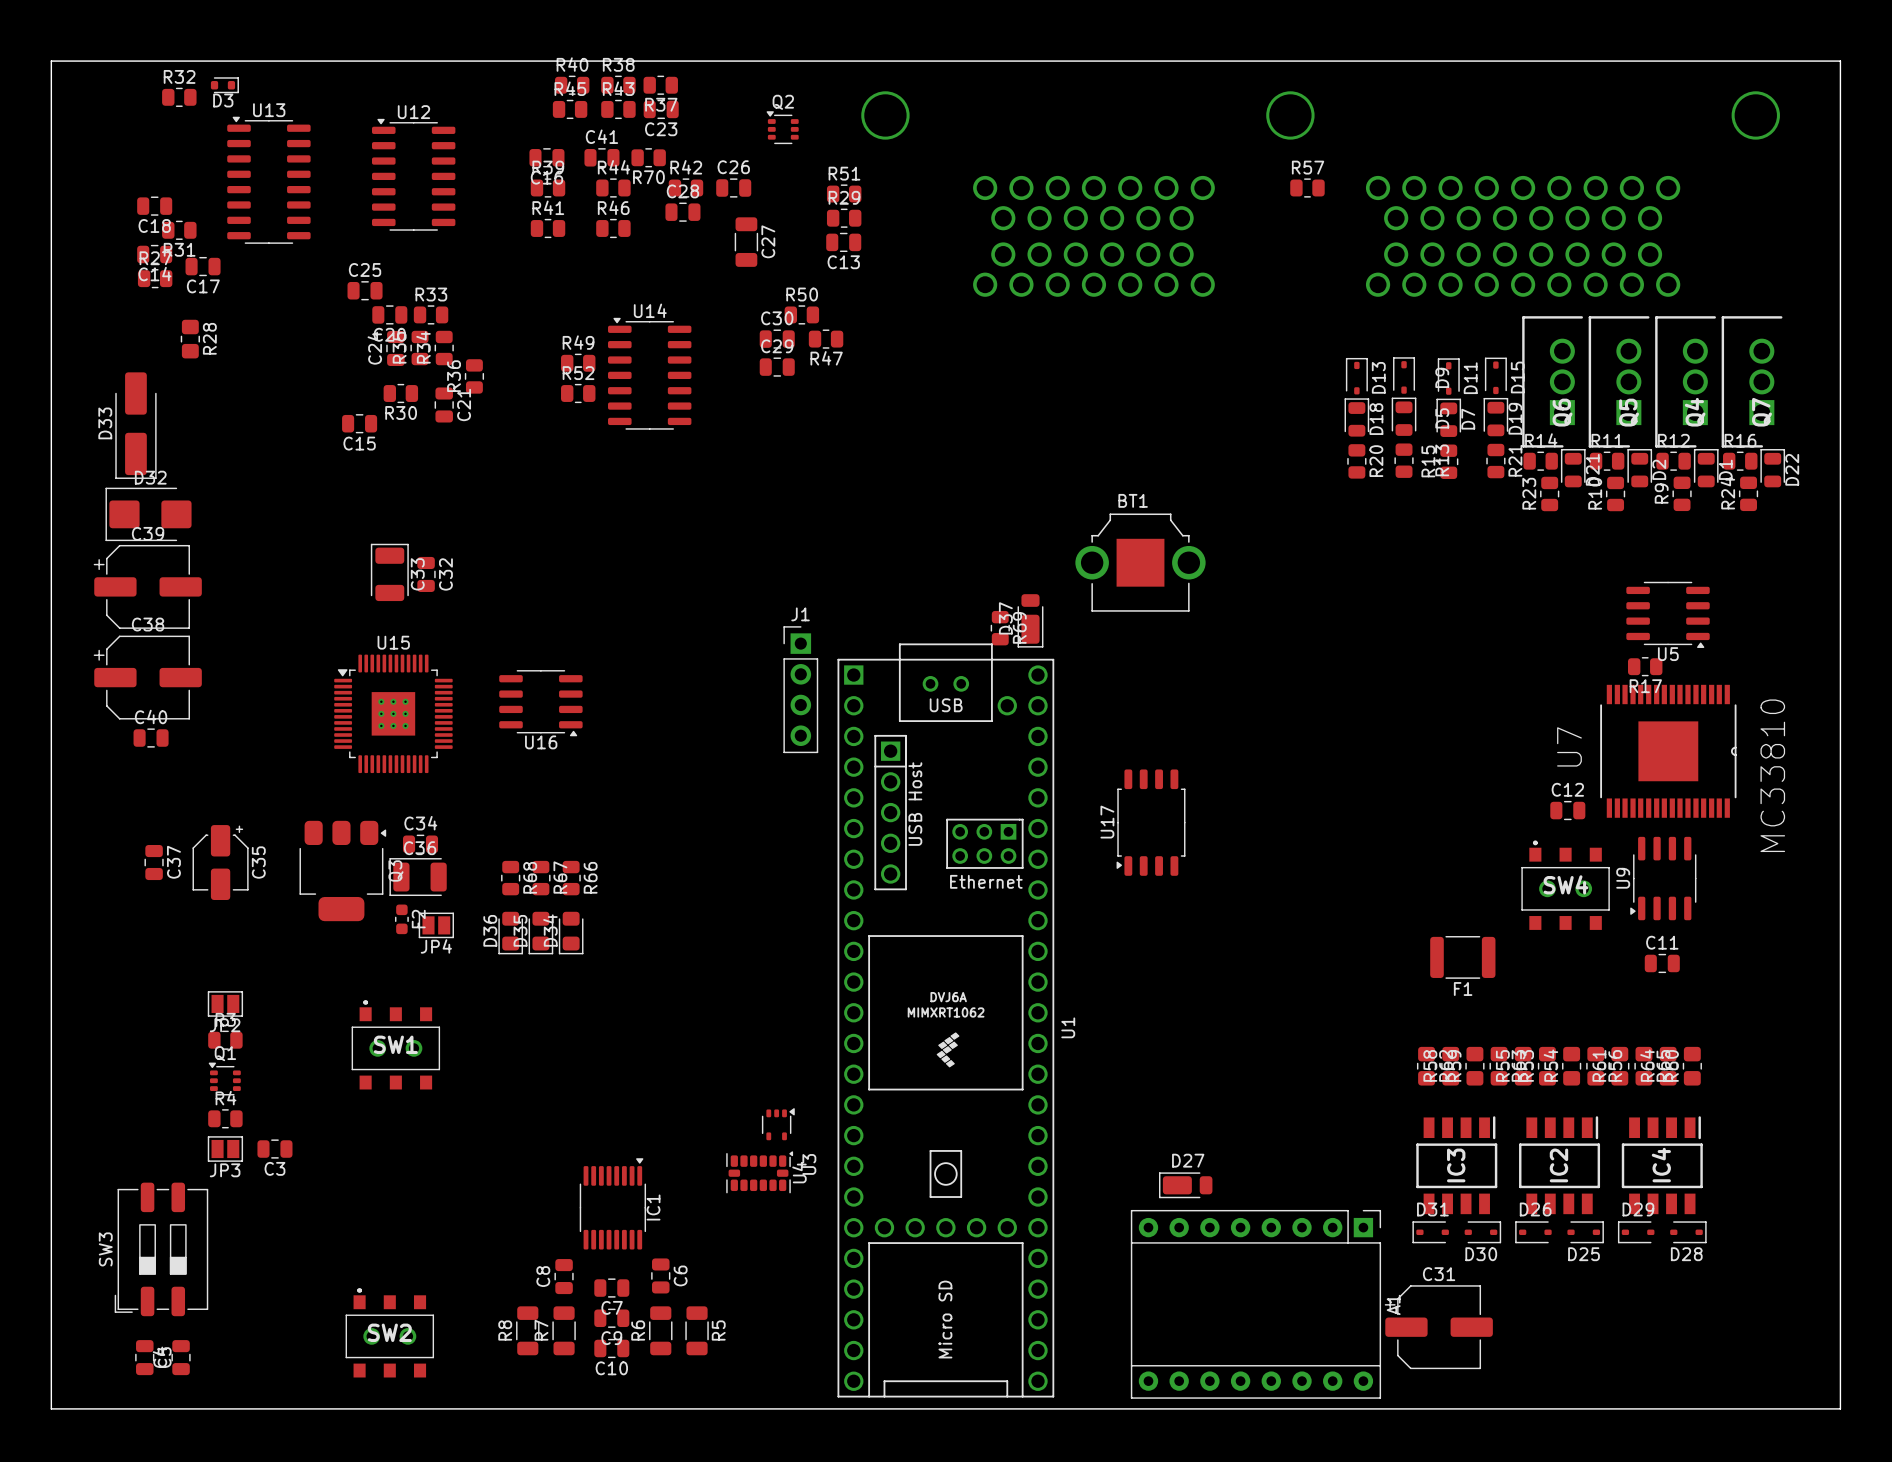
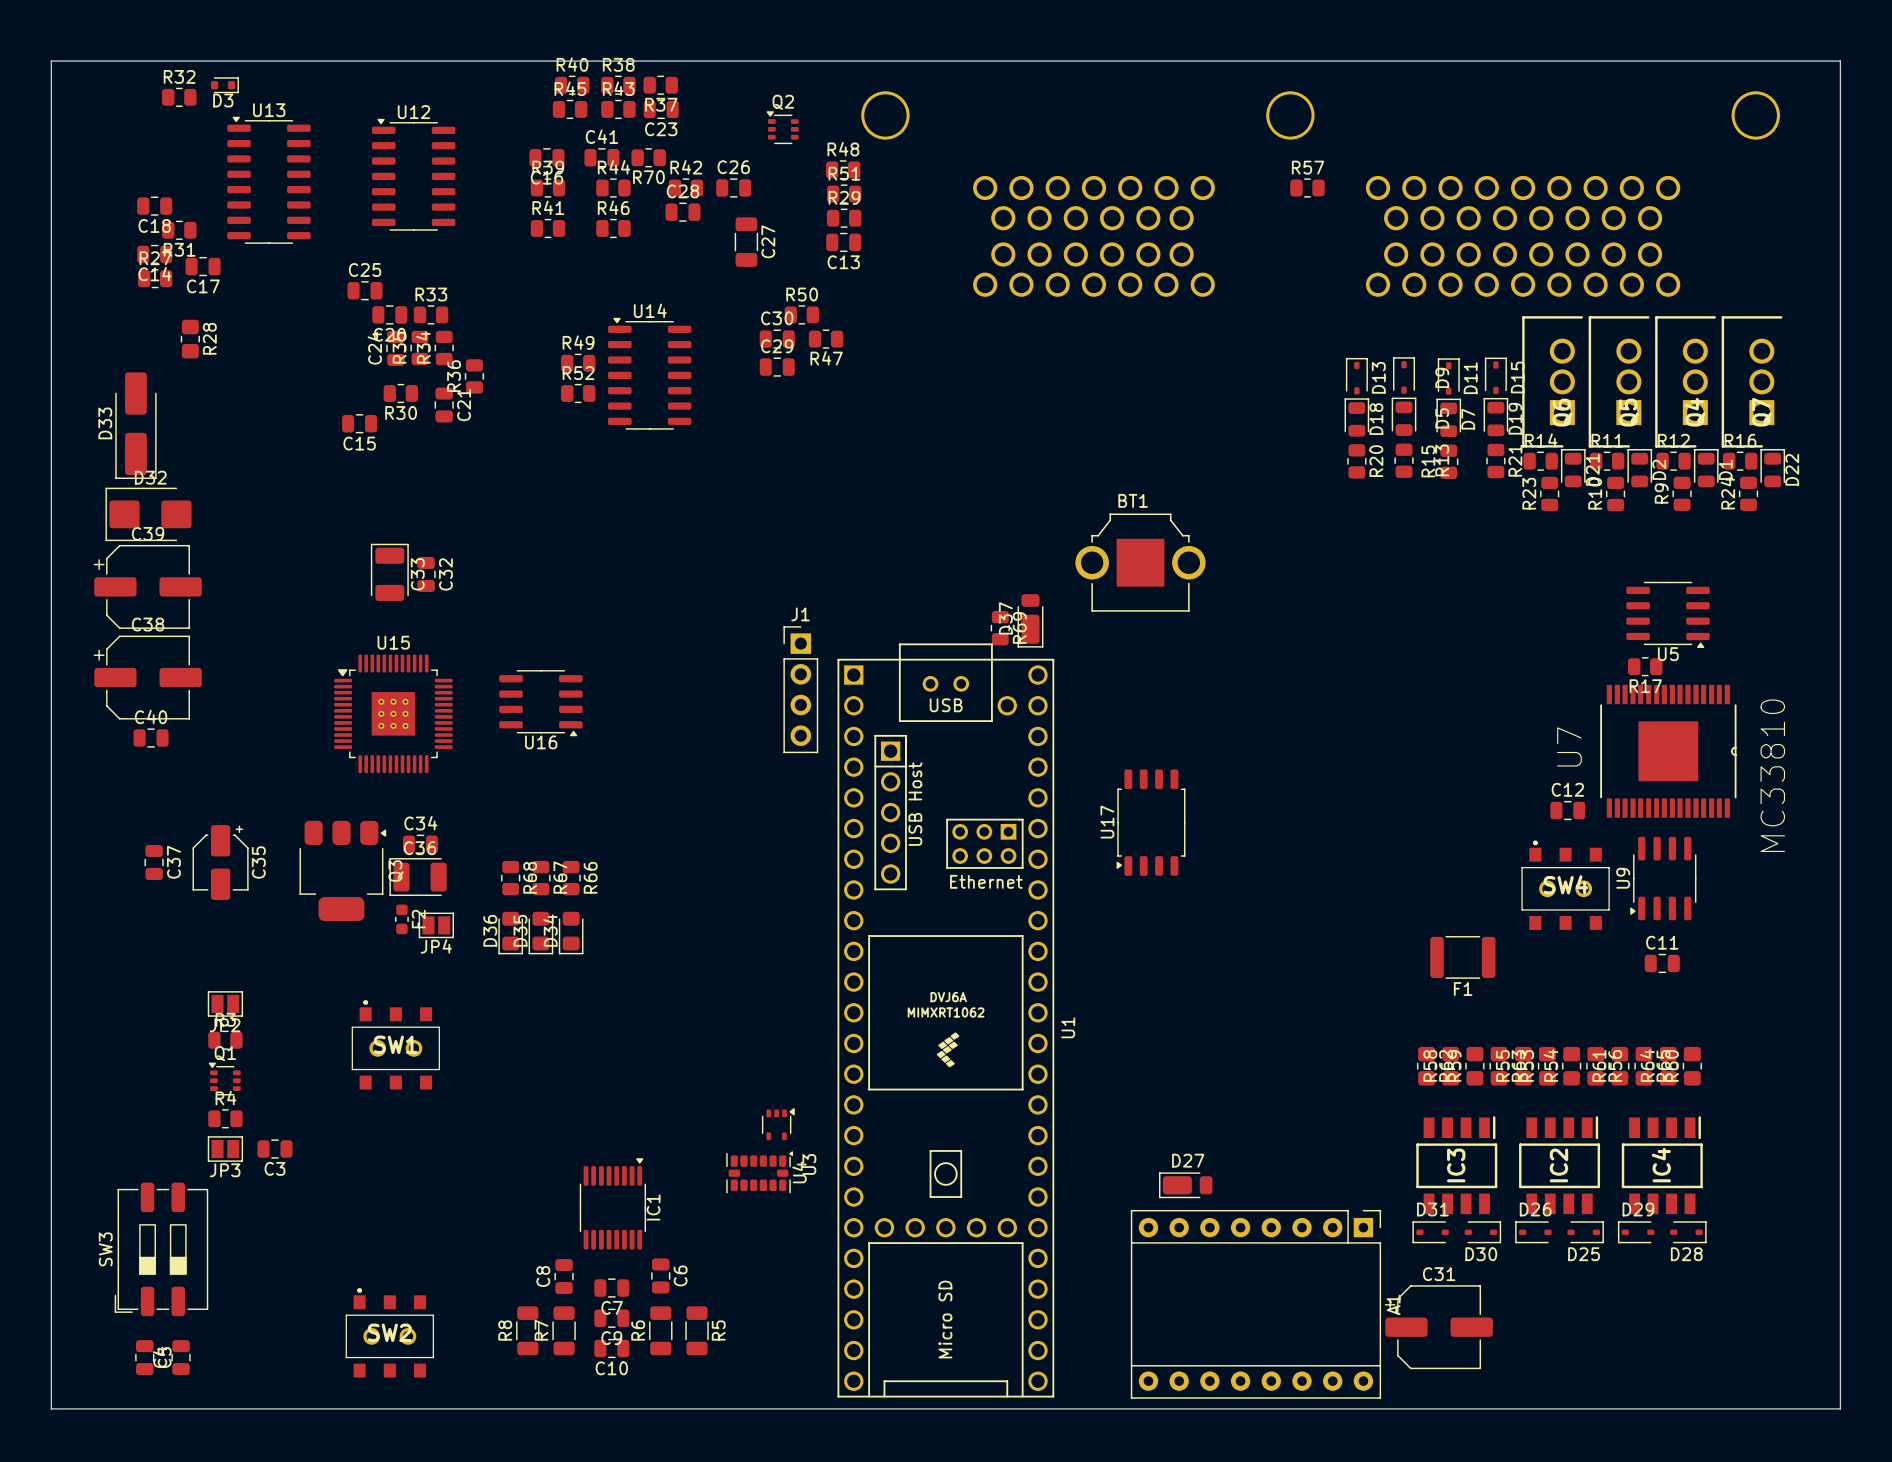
R48: none -> (843, 169)

